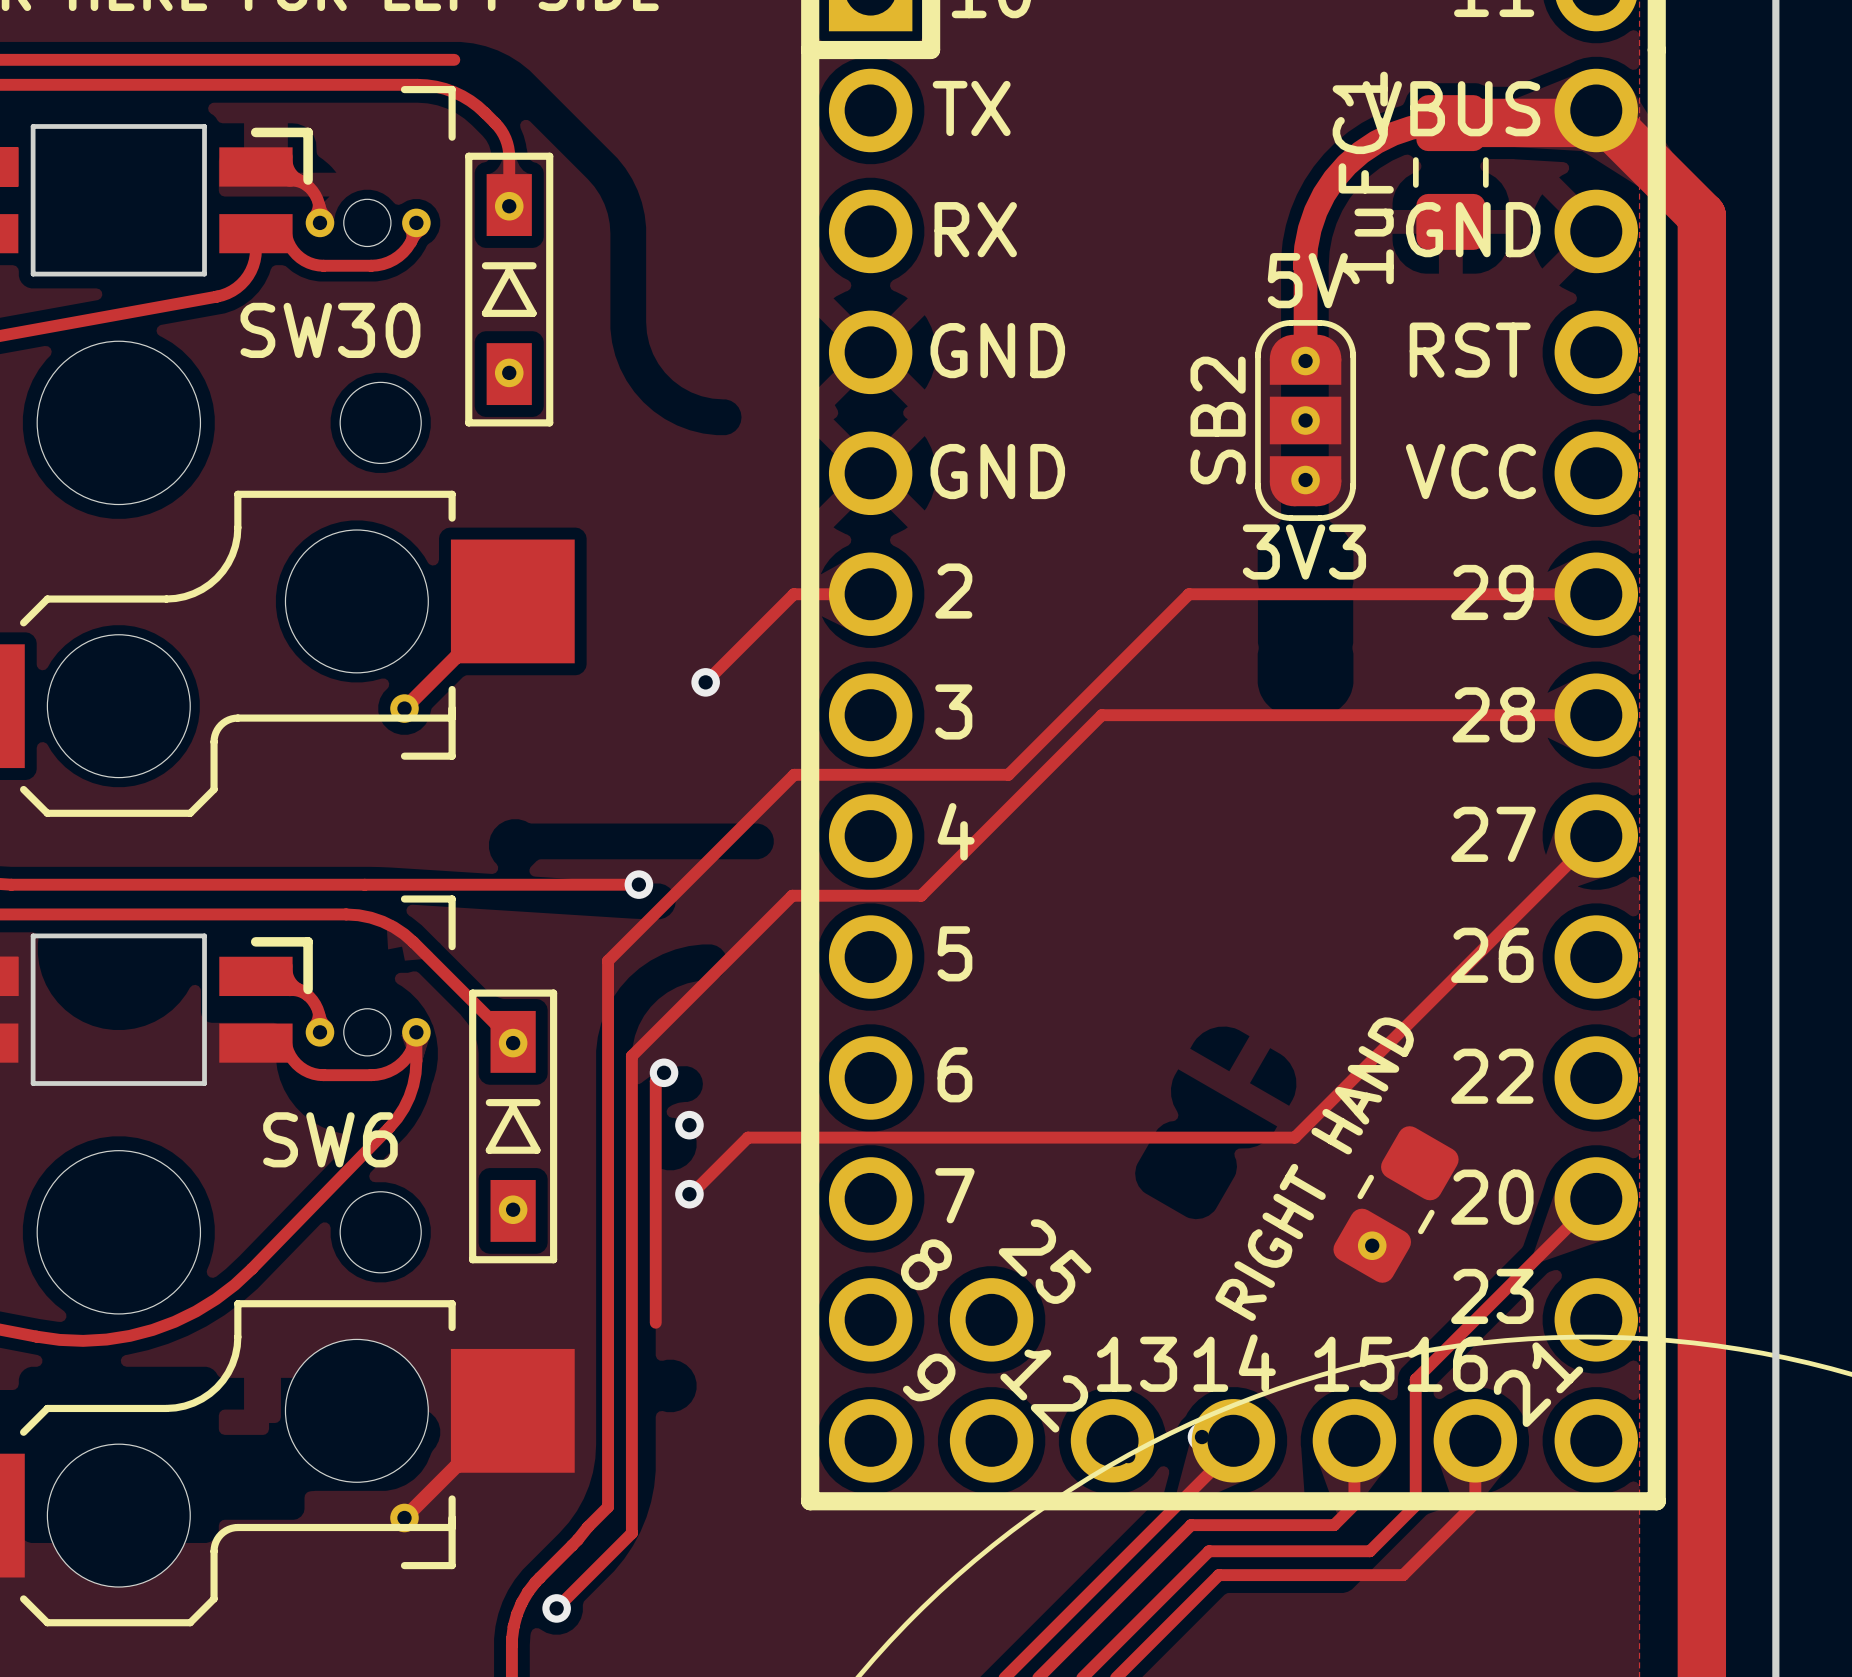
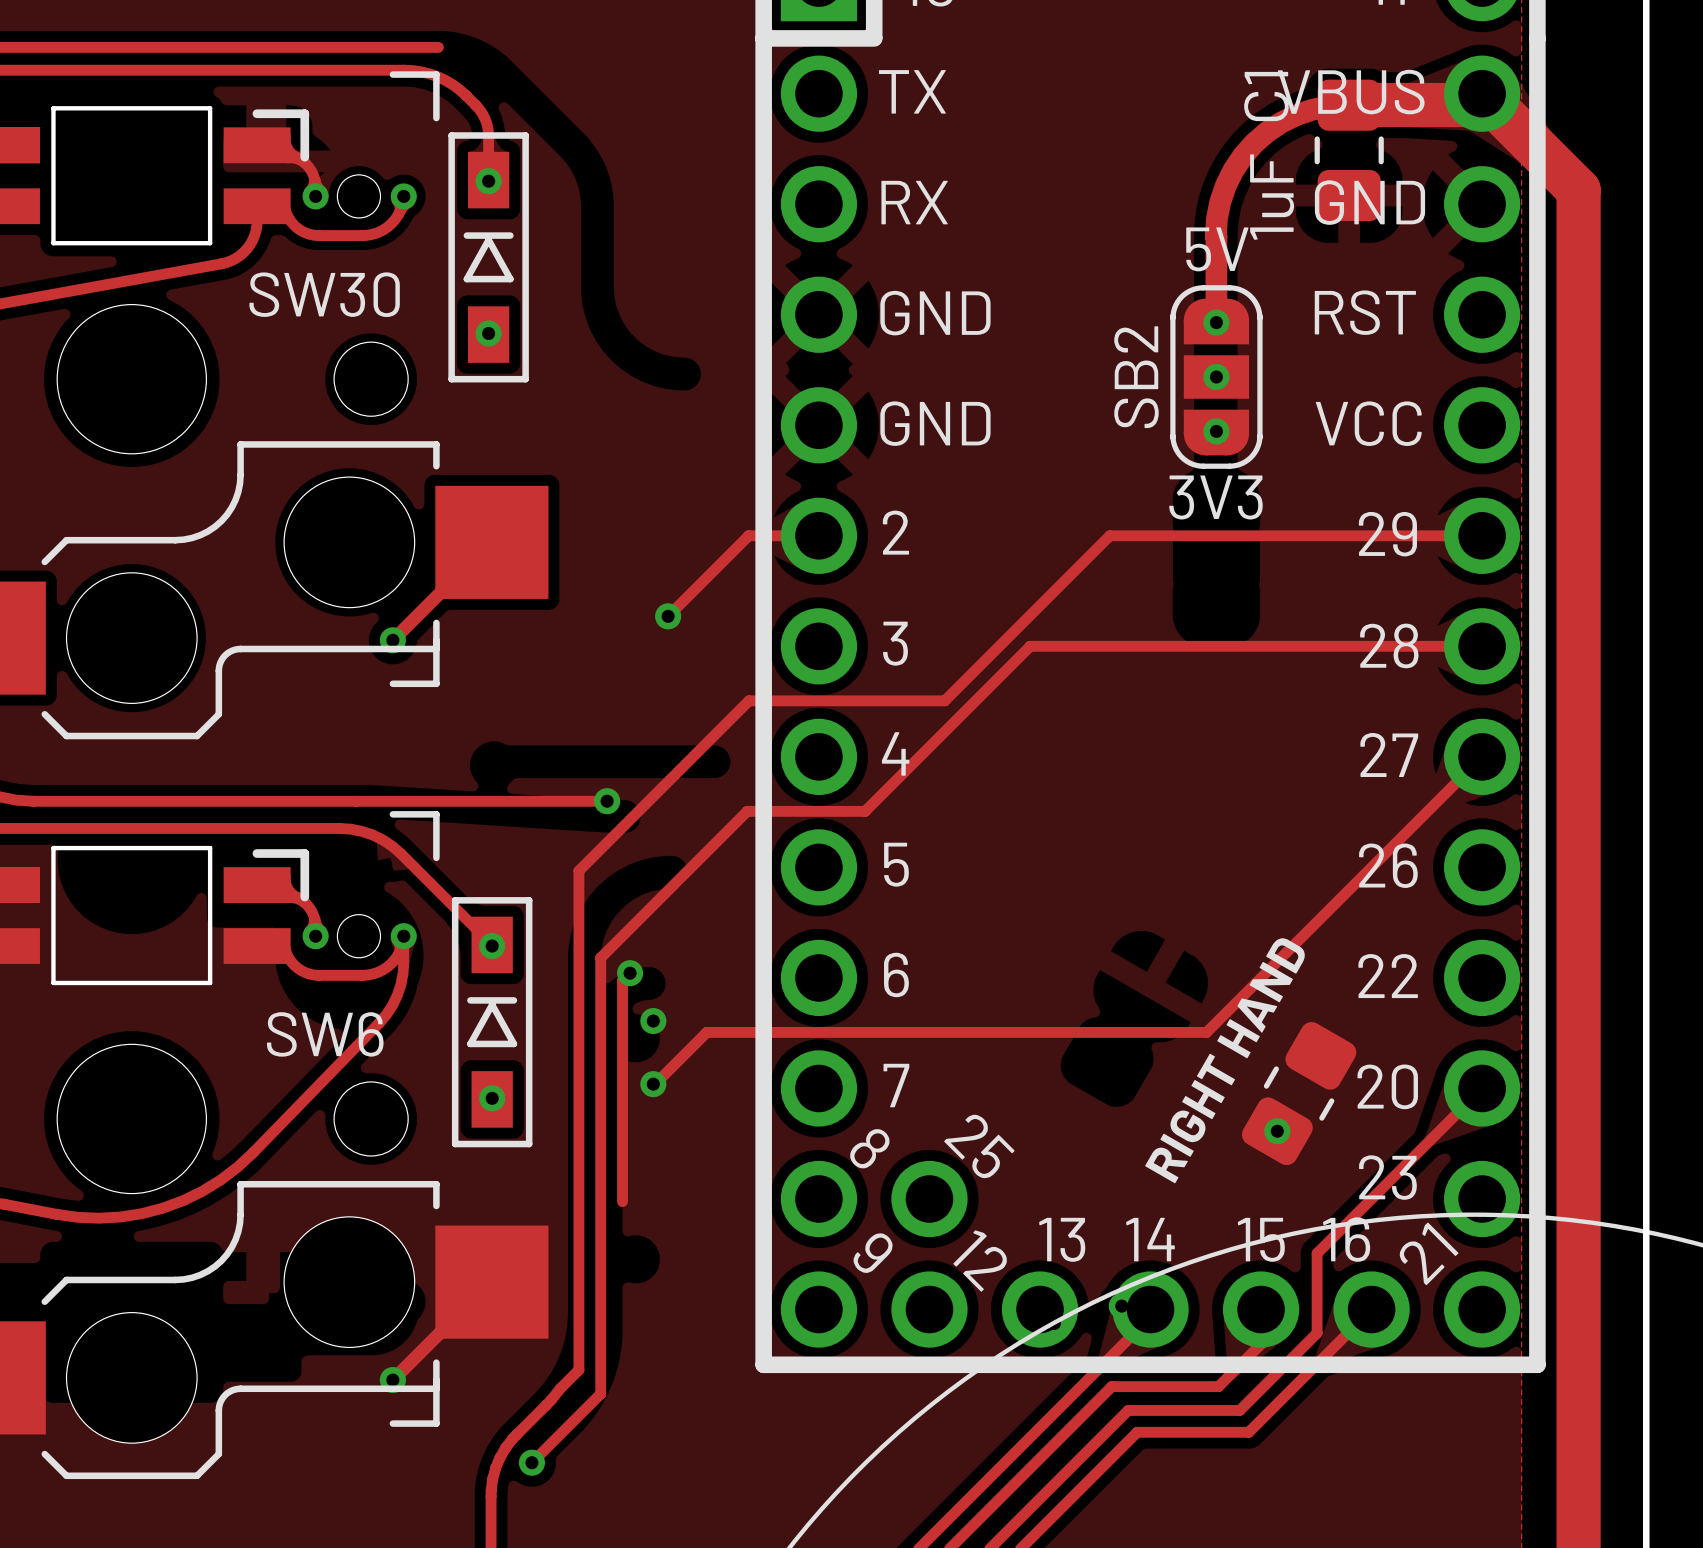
track: (1475, 1440) (1475, 1502) (1403, 1575) (1341, 1575) -> (1371, 1309) (1248, 1432)
track: (1415, 1466) (1415, 1505) (1369, 1551) (1331, 1551) -> (1317, 1333) (1239, 1410)
track: (1354, 1478) (1354, 1504) (1334, 1525) (1307, 1525) -> (1261, 1344) (1218, 1386)

